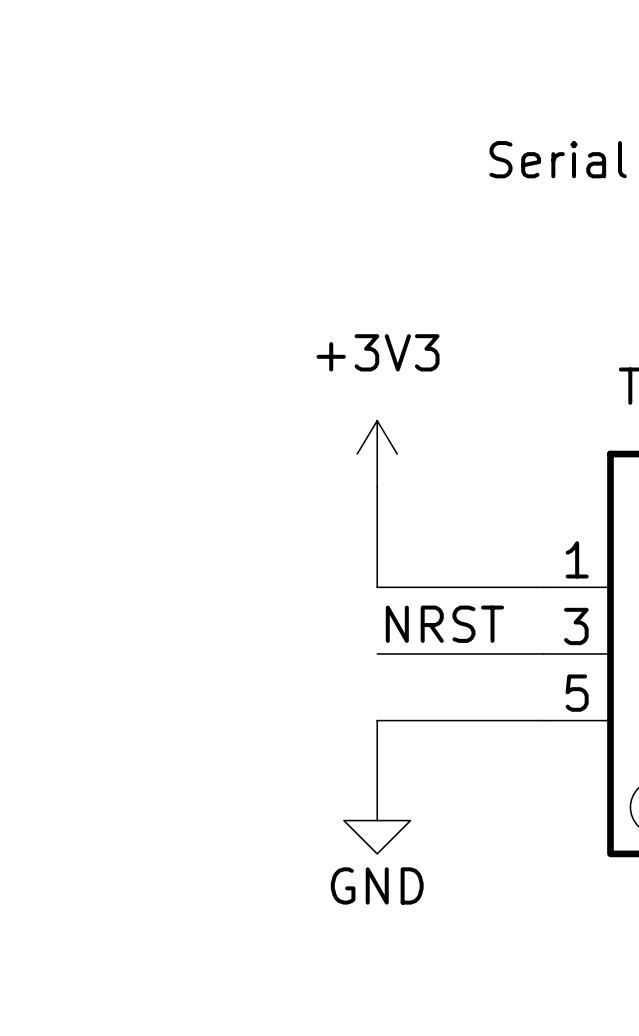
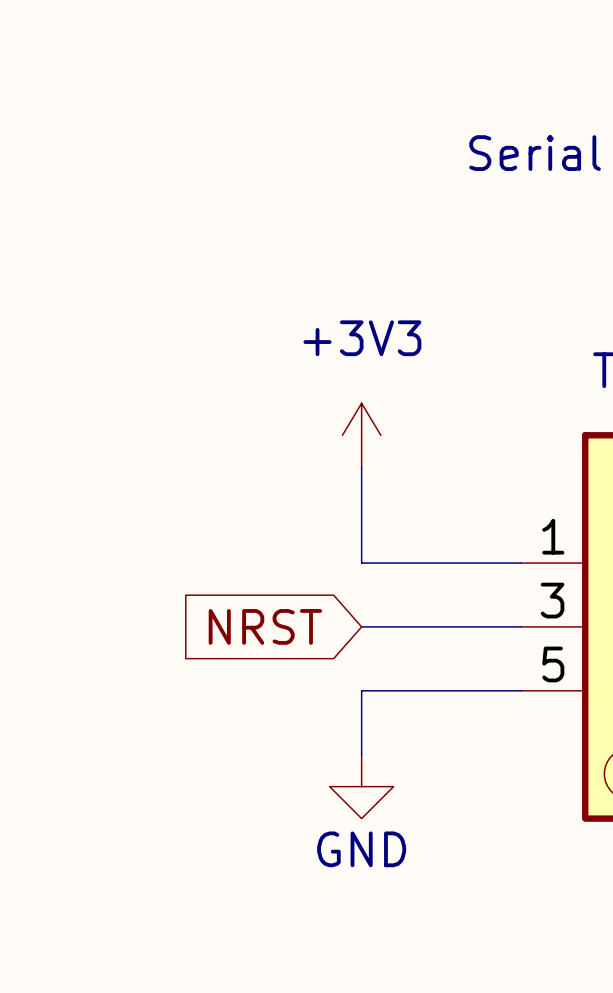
label: NRST (444, 624) -> none
global label: none -> NRST (265, 626)

